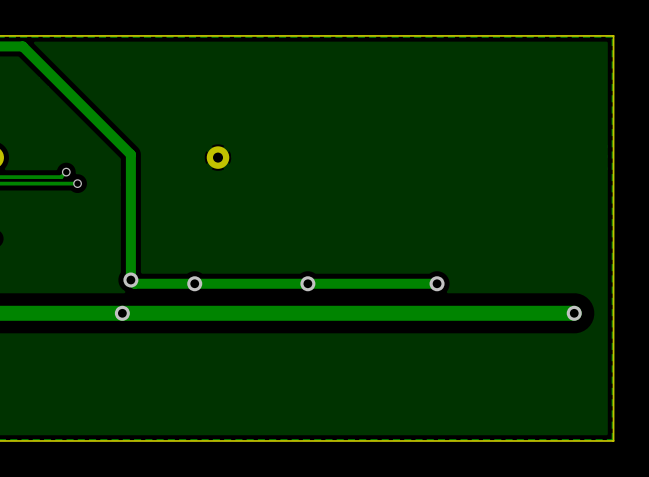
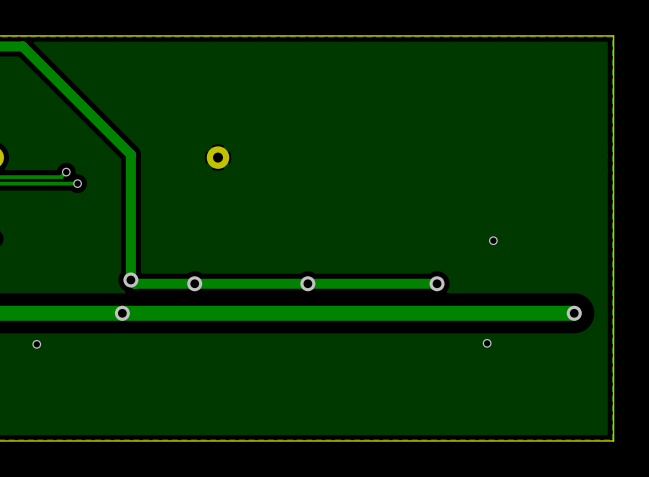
via: none -> (493, 240)
via: none -> (487, 343)
via: none -> (36, 344)

